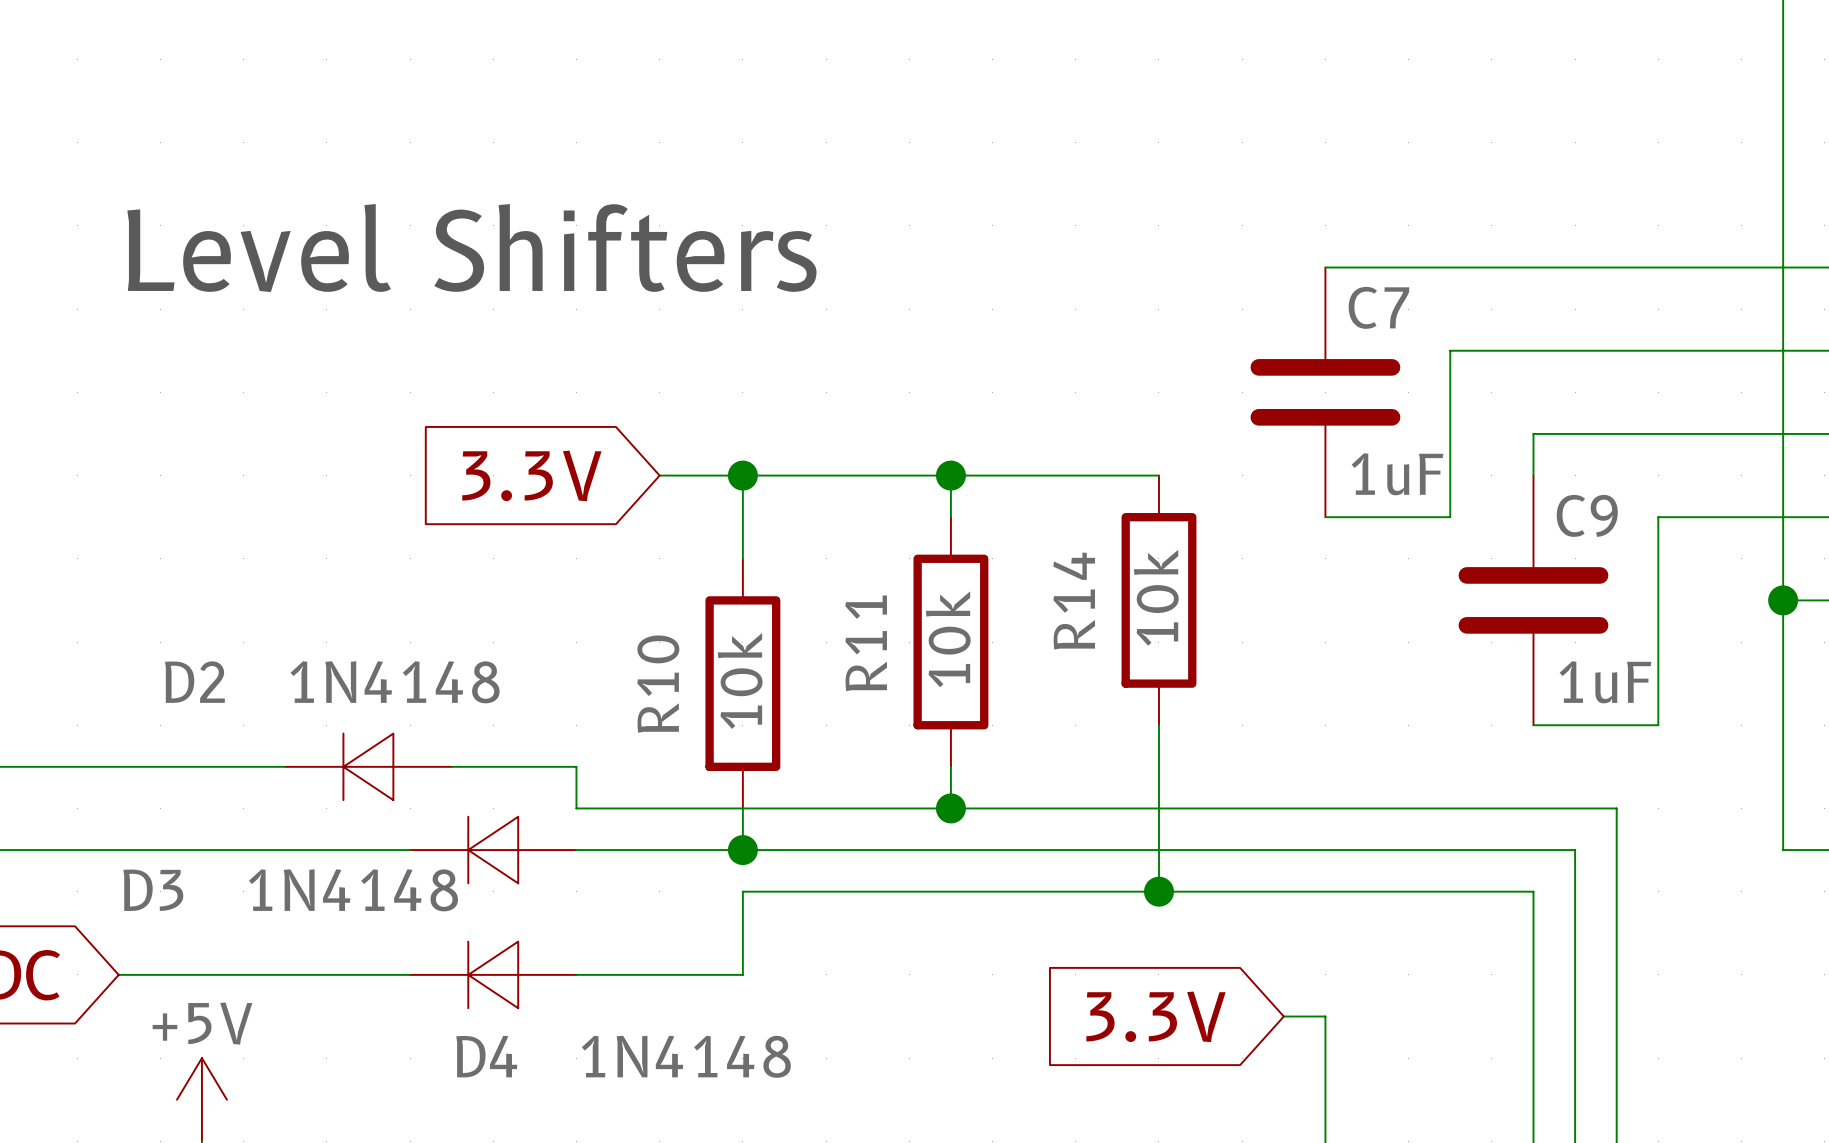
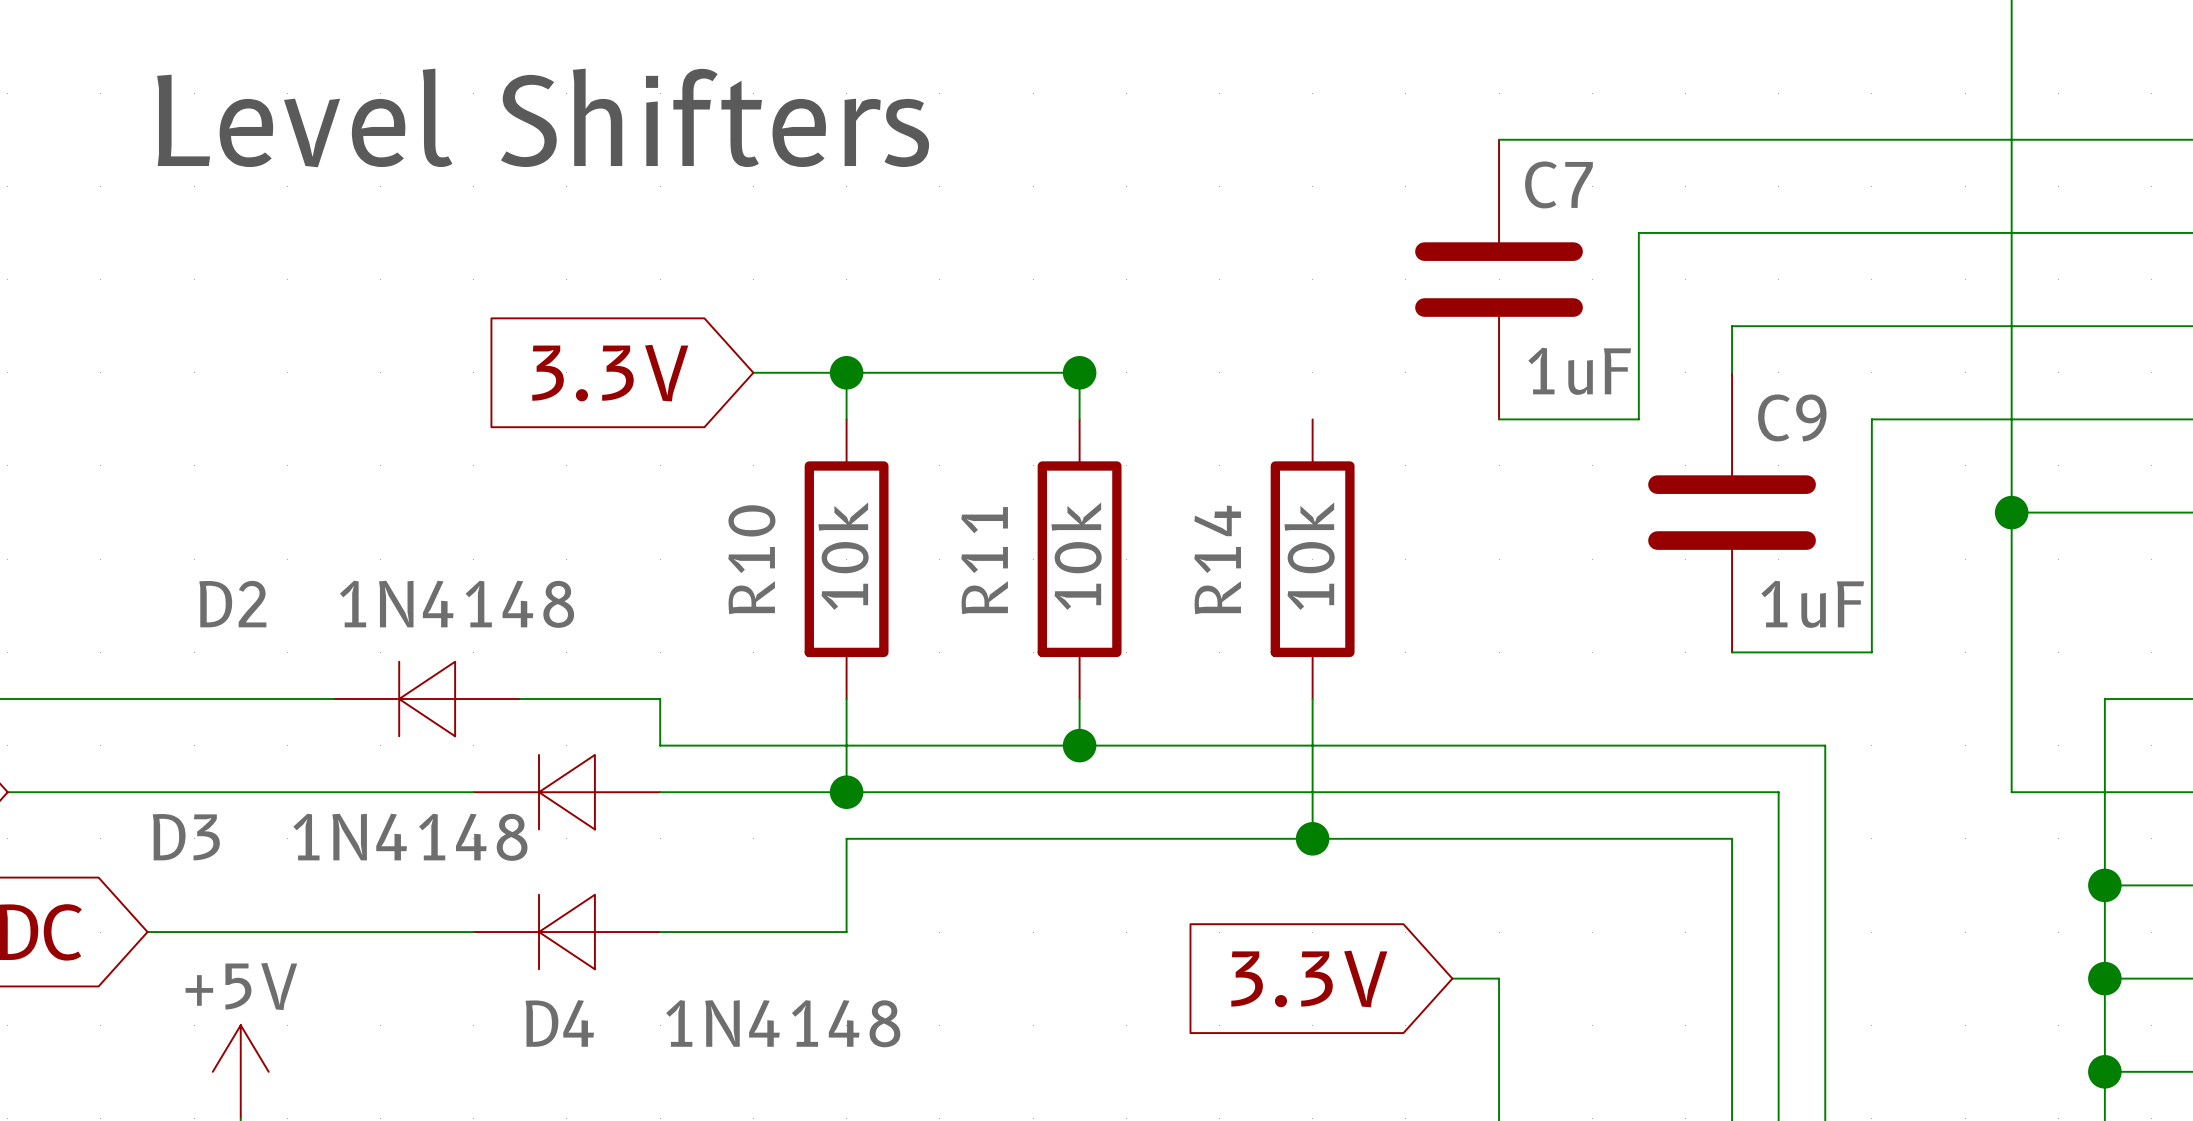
wire: (950, 475) (1158, 475) -> none
R14 position: (1158, 600) -> (1312, 559)
R10 position: (742, 683) -> (846, 559)

